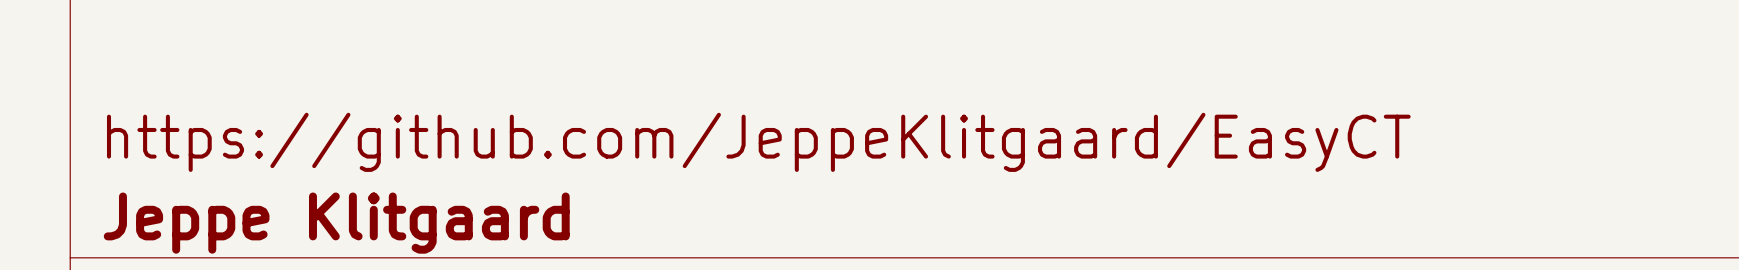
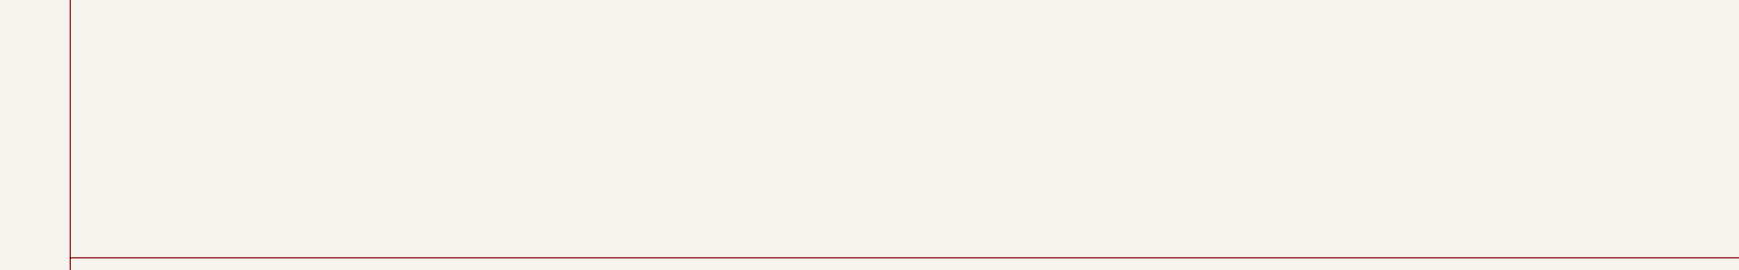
title block: https://github.com/JeppeKlitgaard/EasyCT (758, 142) -> none
title block: Jeppe Klitgaard (336, 223) -> none

